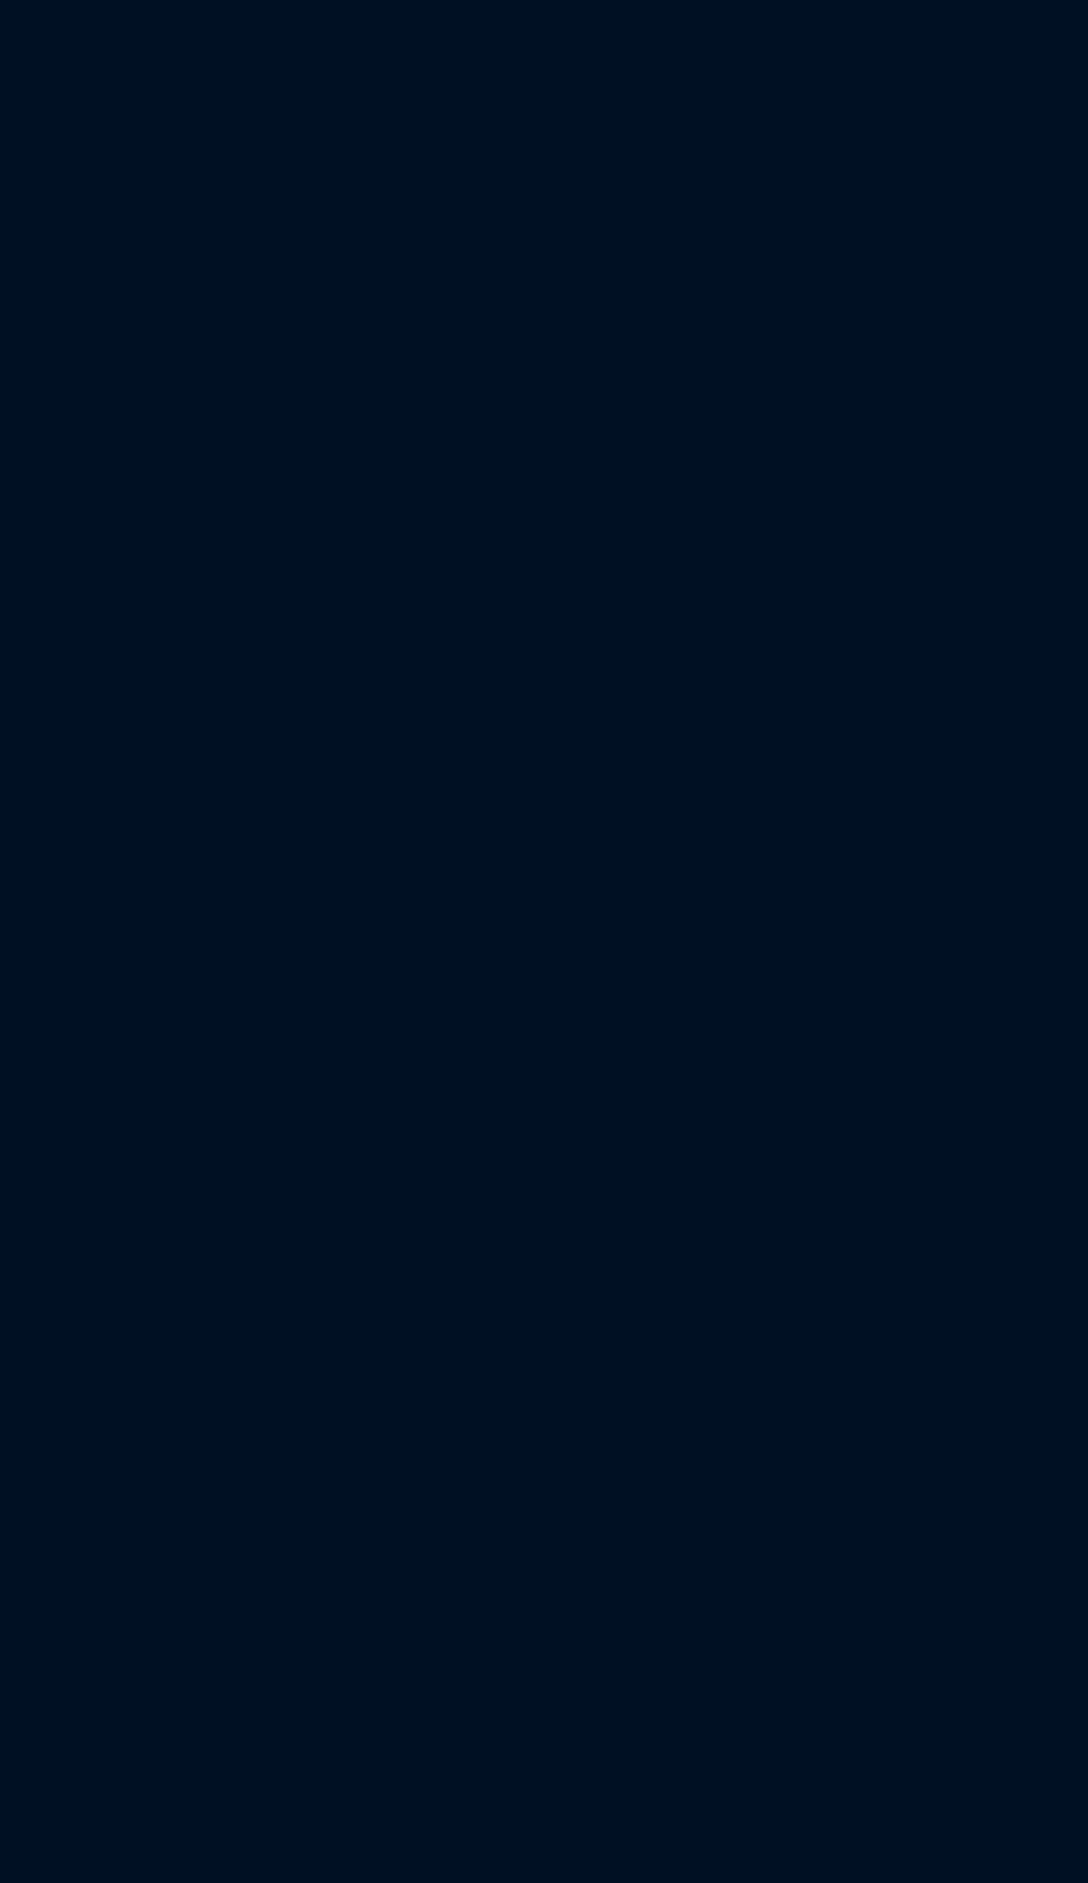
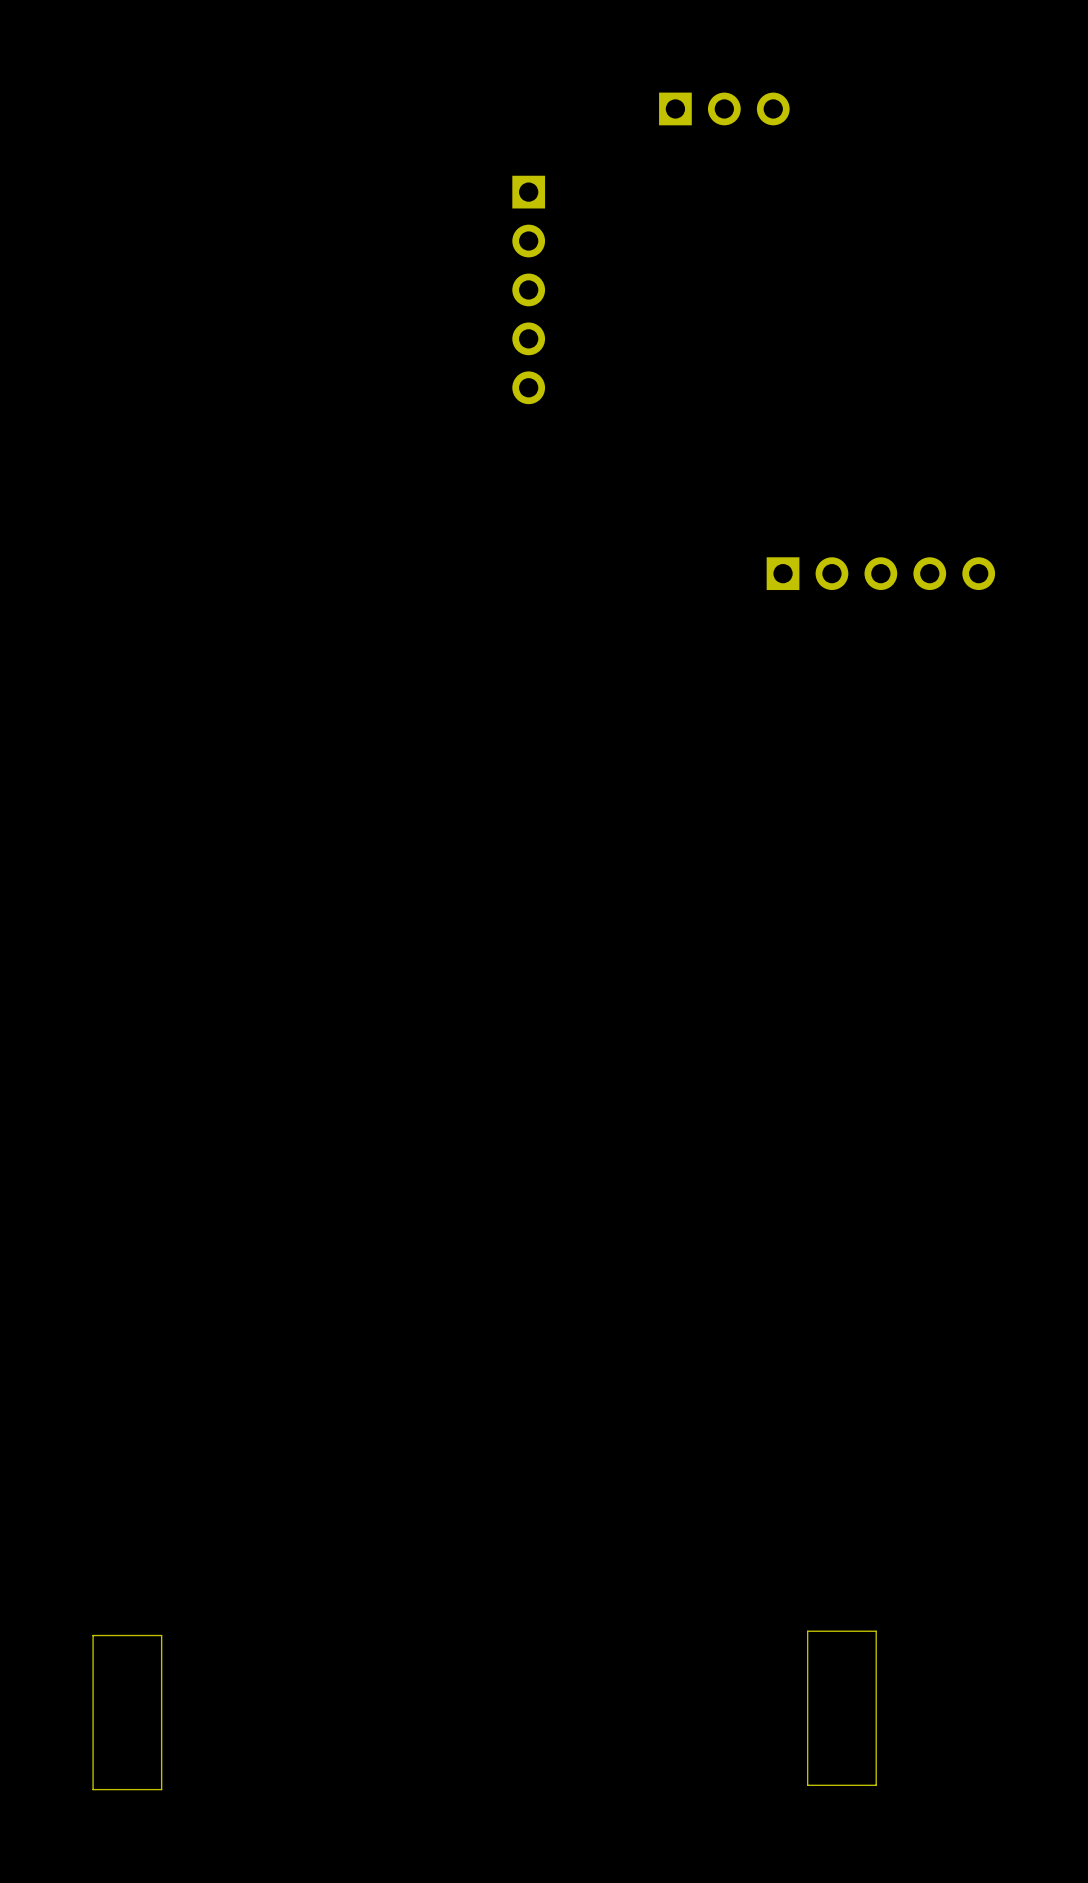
part: none -> (724, 108)
part: none -> (528, 289)
part: none -> (880, 573)
part: none -> (841, 1708)
part: none -> (127, 1712)

